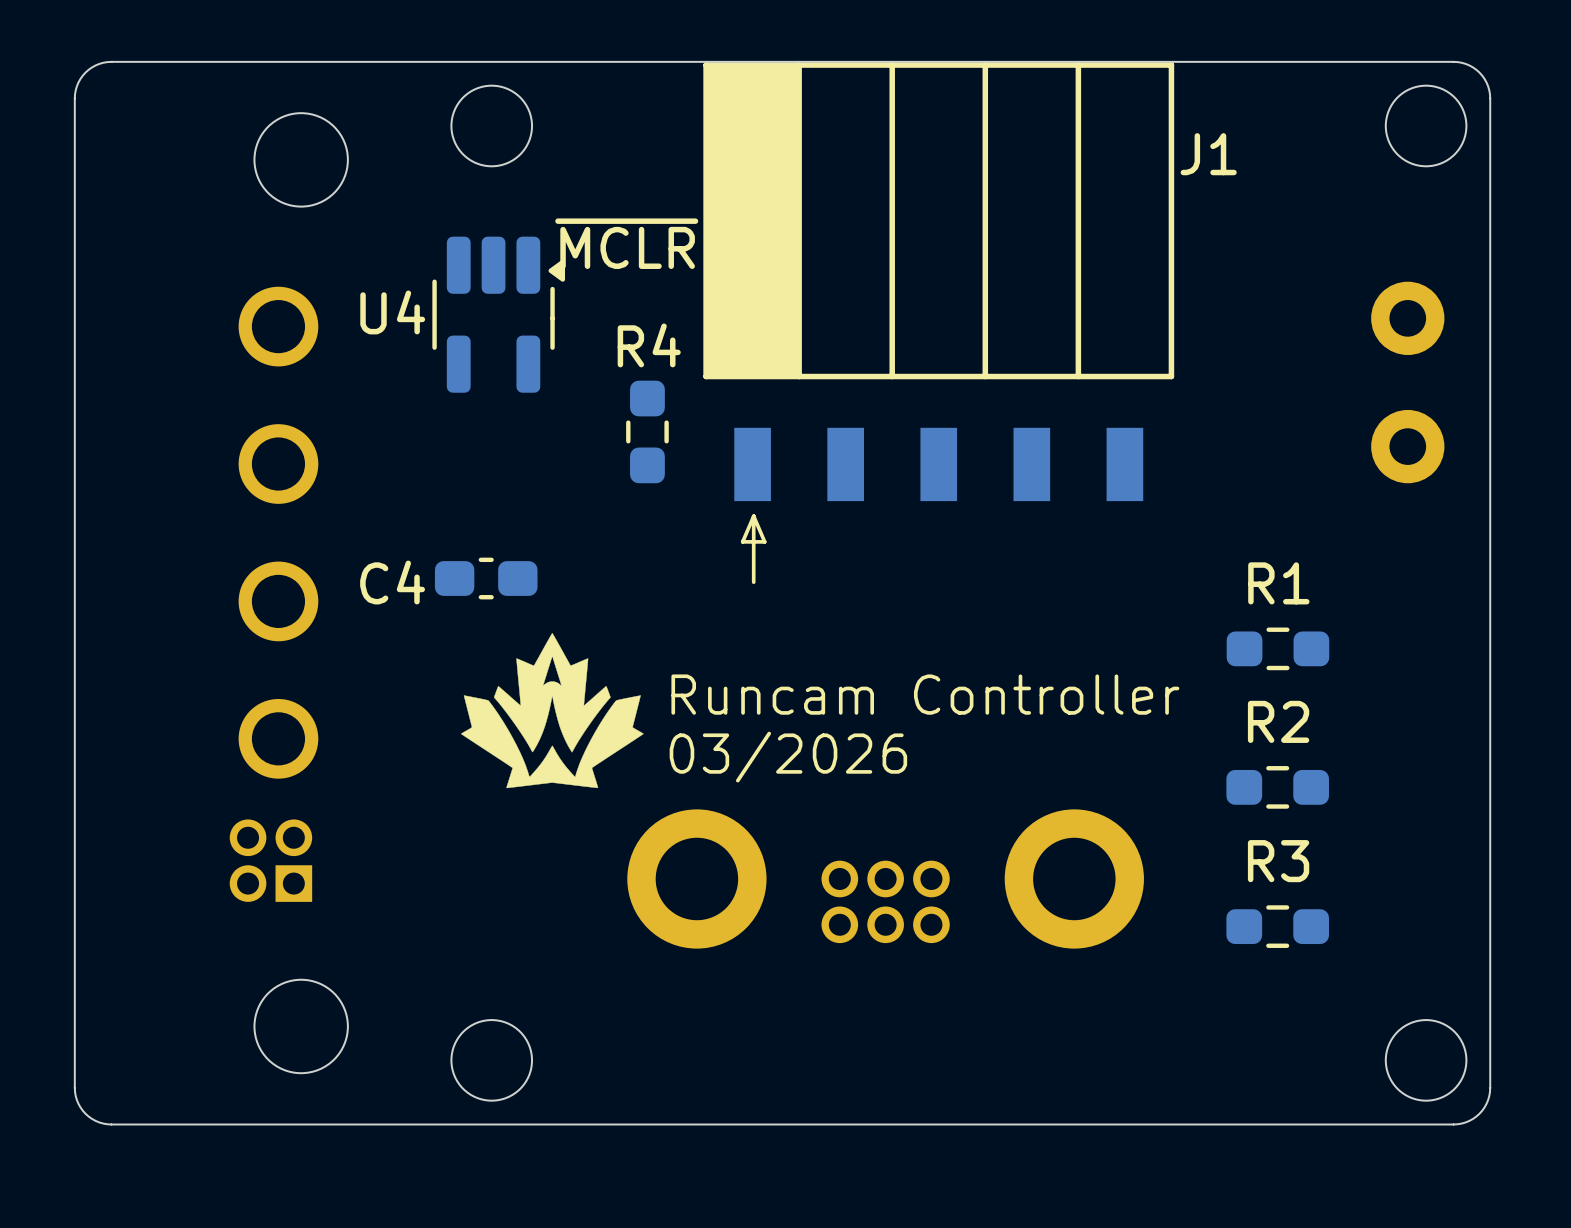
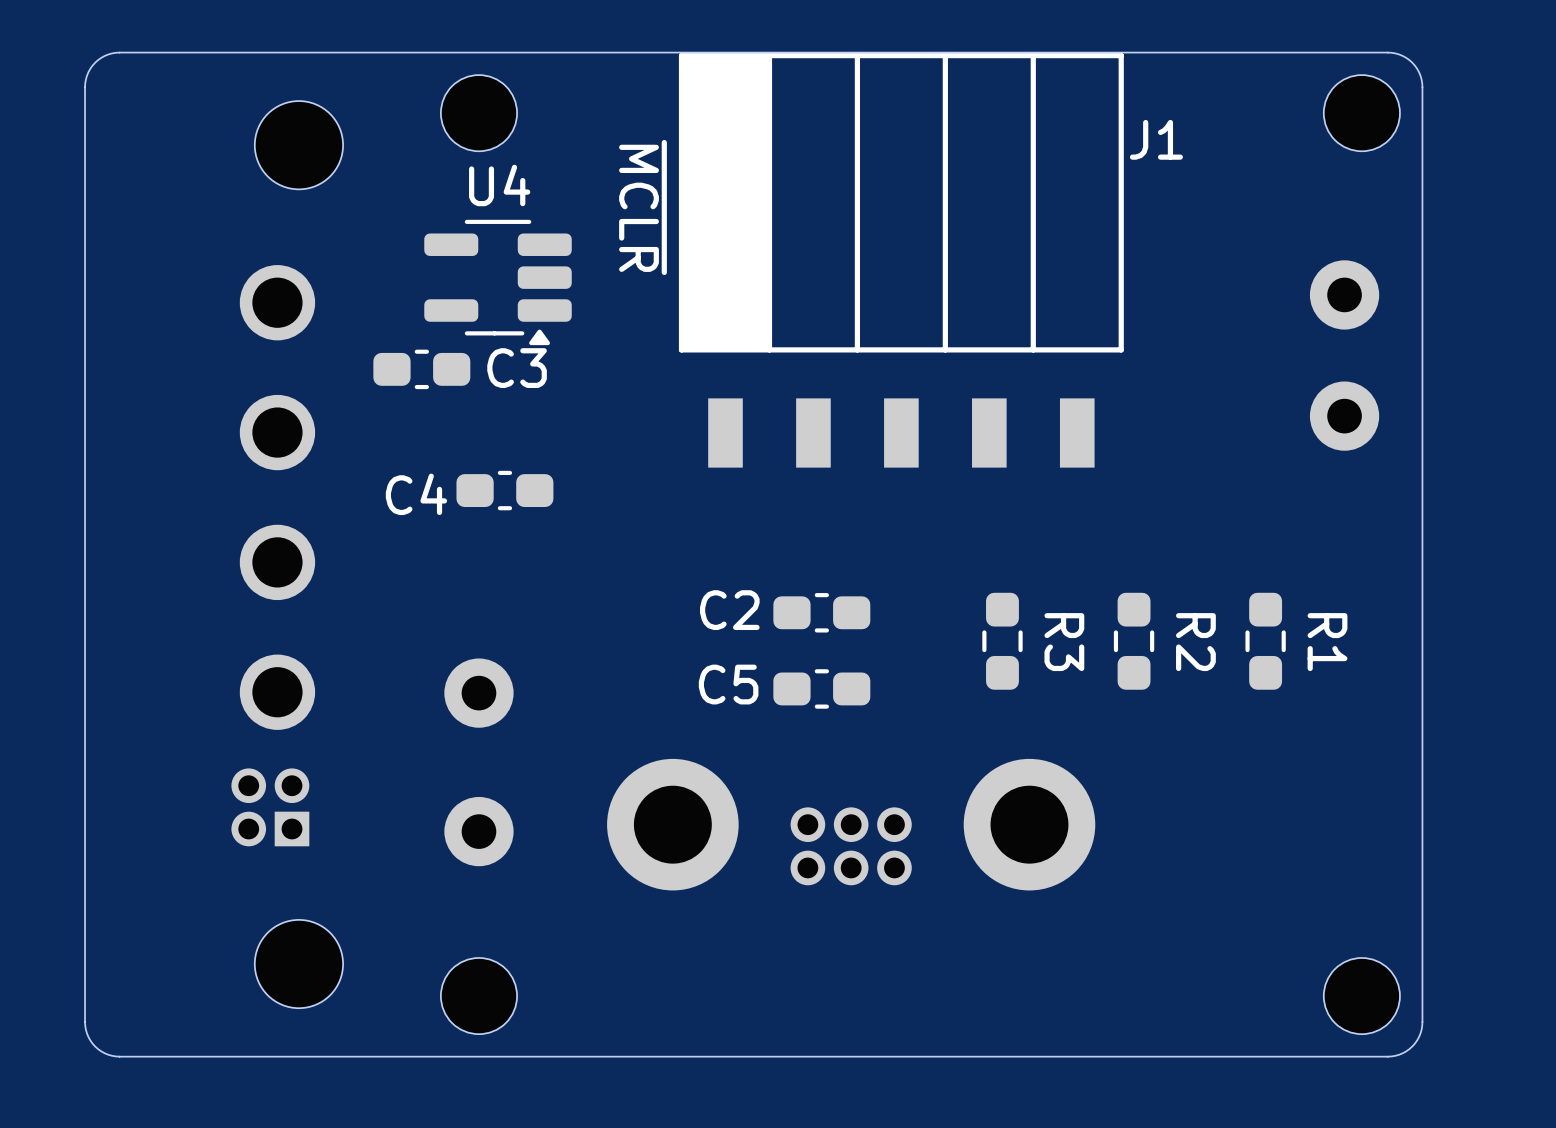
text rotation: 0° (626, 243) -> 90° clockwise (643, 207)
U4 rotation: 0° (498, 314) -> 90° clockwise (498, 282)
C3: none -> (421, 369)
R4: (647, 431) -> none
line: (753, 516) (753, 582) -> none
line: (753, 516) (764, 541) (742, 541) (753, 516) -> none
C4 position: (486, 578) -> (504, 490)
drawing: [460, 633, 644, 789] -> none
R1 rotation: 0° (1277, 648) -> 90° clockwise (1265, 641)
C2: none -> (821, 612)
text: Runcam Controller (925, 694) -> none
C5: none -> (821, 688)
part: none -> (478, 693)
text: 03/2026 (788, 757) -> none
R2 rotation: 0° (1277, 787) -> 90° clockwise (1134, 641)
R2 position: (1277, 787) -> (1134, 641)
part: none -> (478, 831)
R3 rotation: 0° (1277, 926) -> 90° clockwise (1002, 641)
R3 position: (1277, 926) -> (1002, 641)

